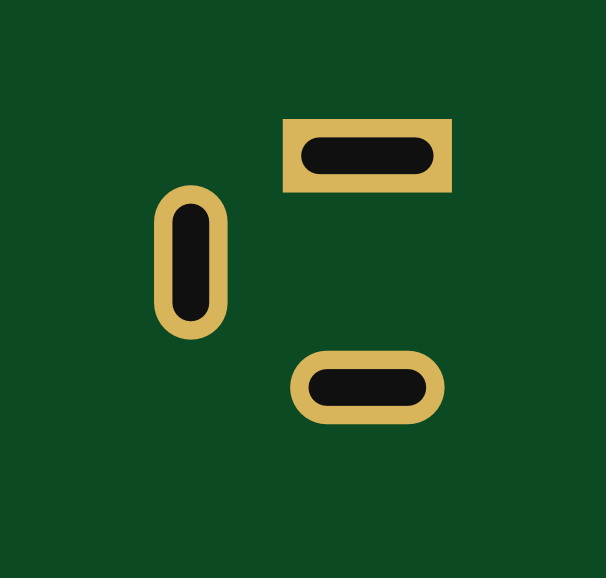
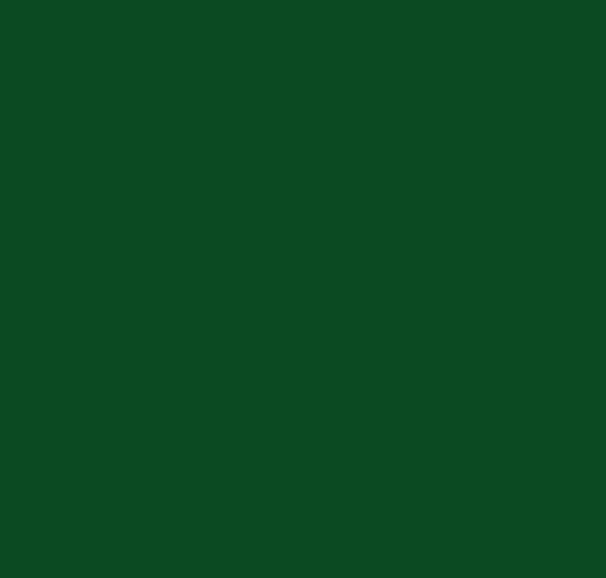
part: (302, 271) -> none

